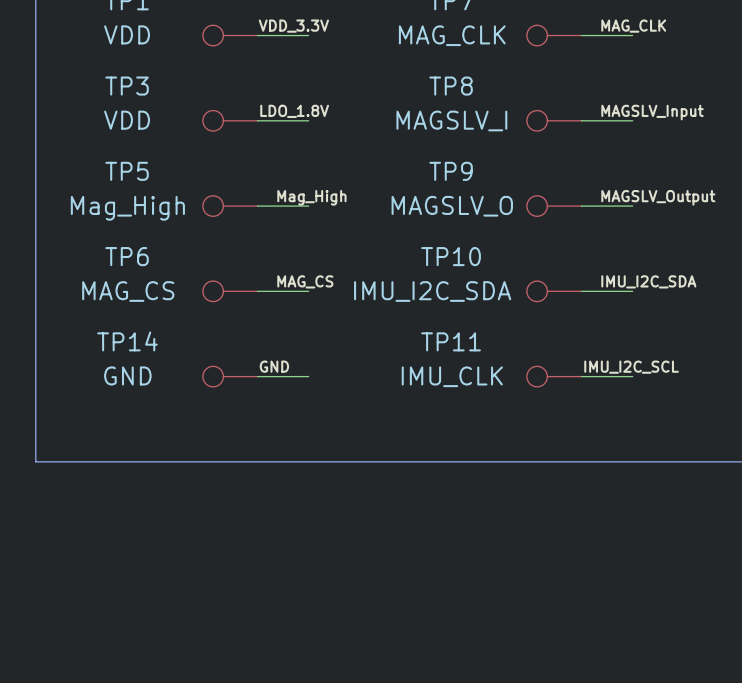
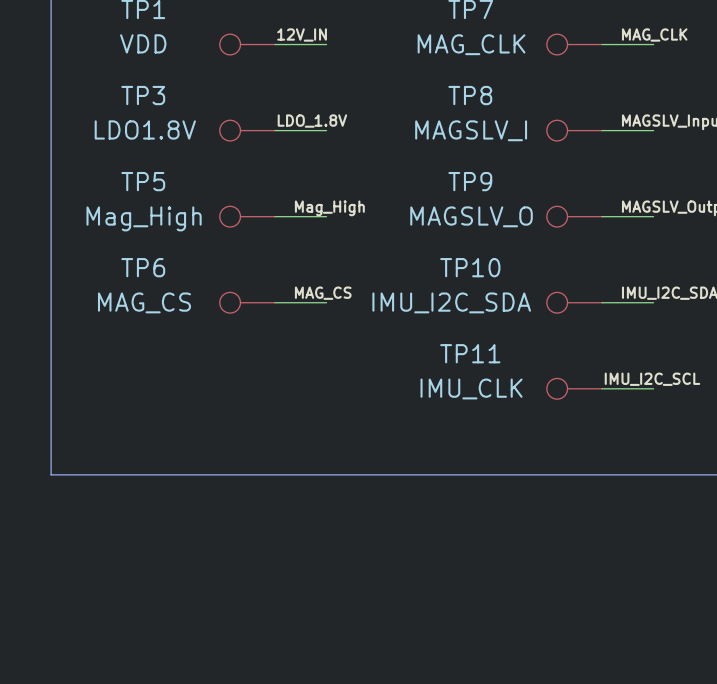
label: VDD_3.3V (293, 26) -> 12V_IN (302, 34)
TP3 value: VDD (127, 120) -> LDO1.8V (145, 129)
label: GND (274, 366) -> none
TP14: GND (230, 376) -> none
wire: (257, 376) (308, 376) -> none

